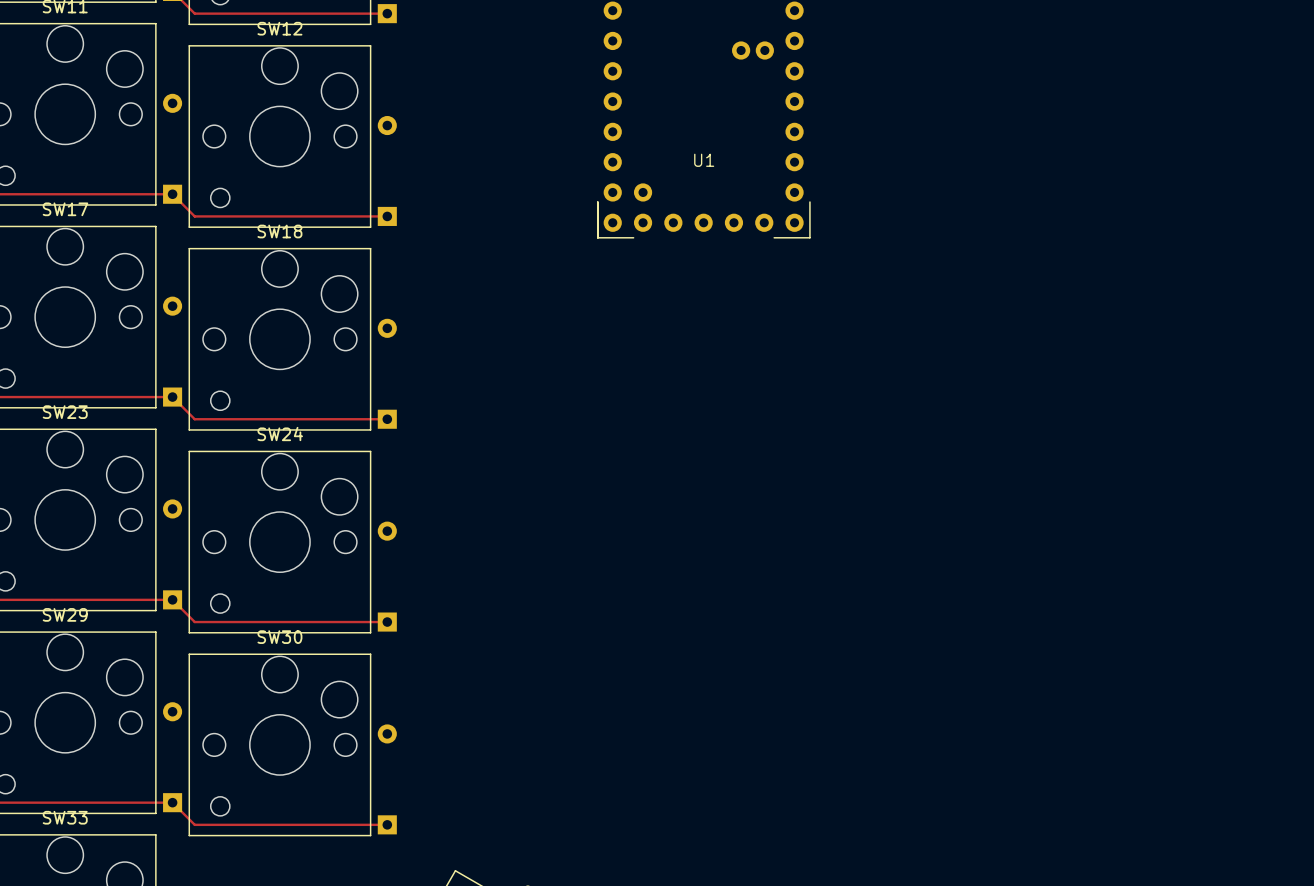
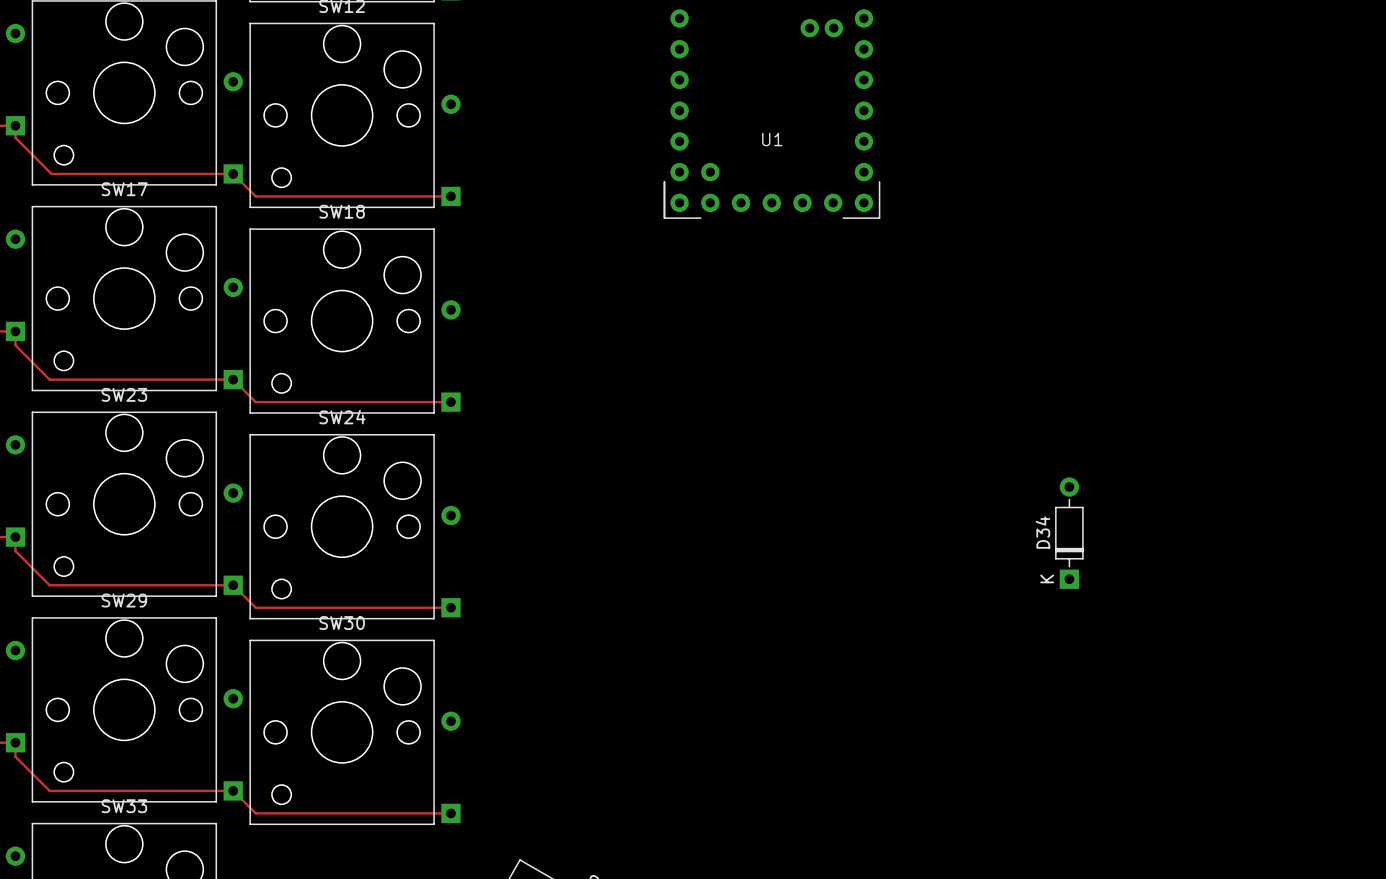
D34: none -> (1069, 533)

